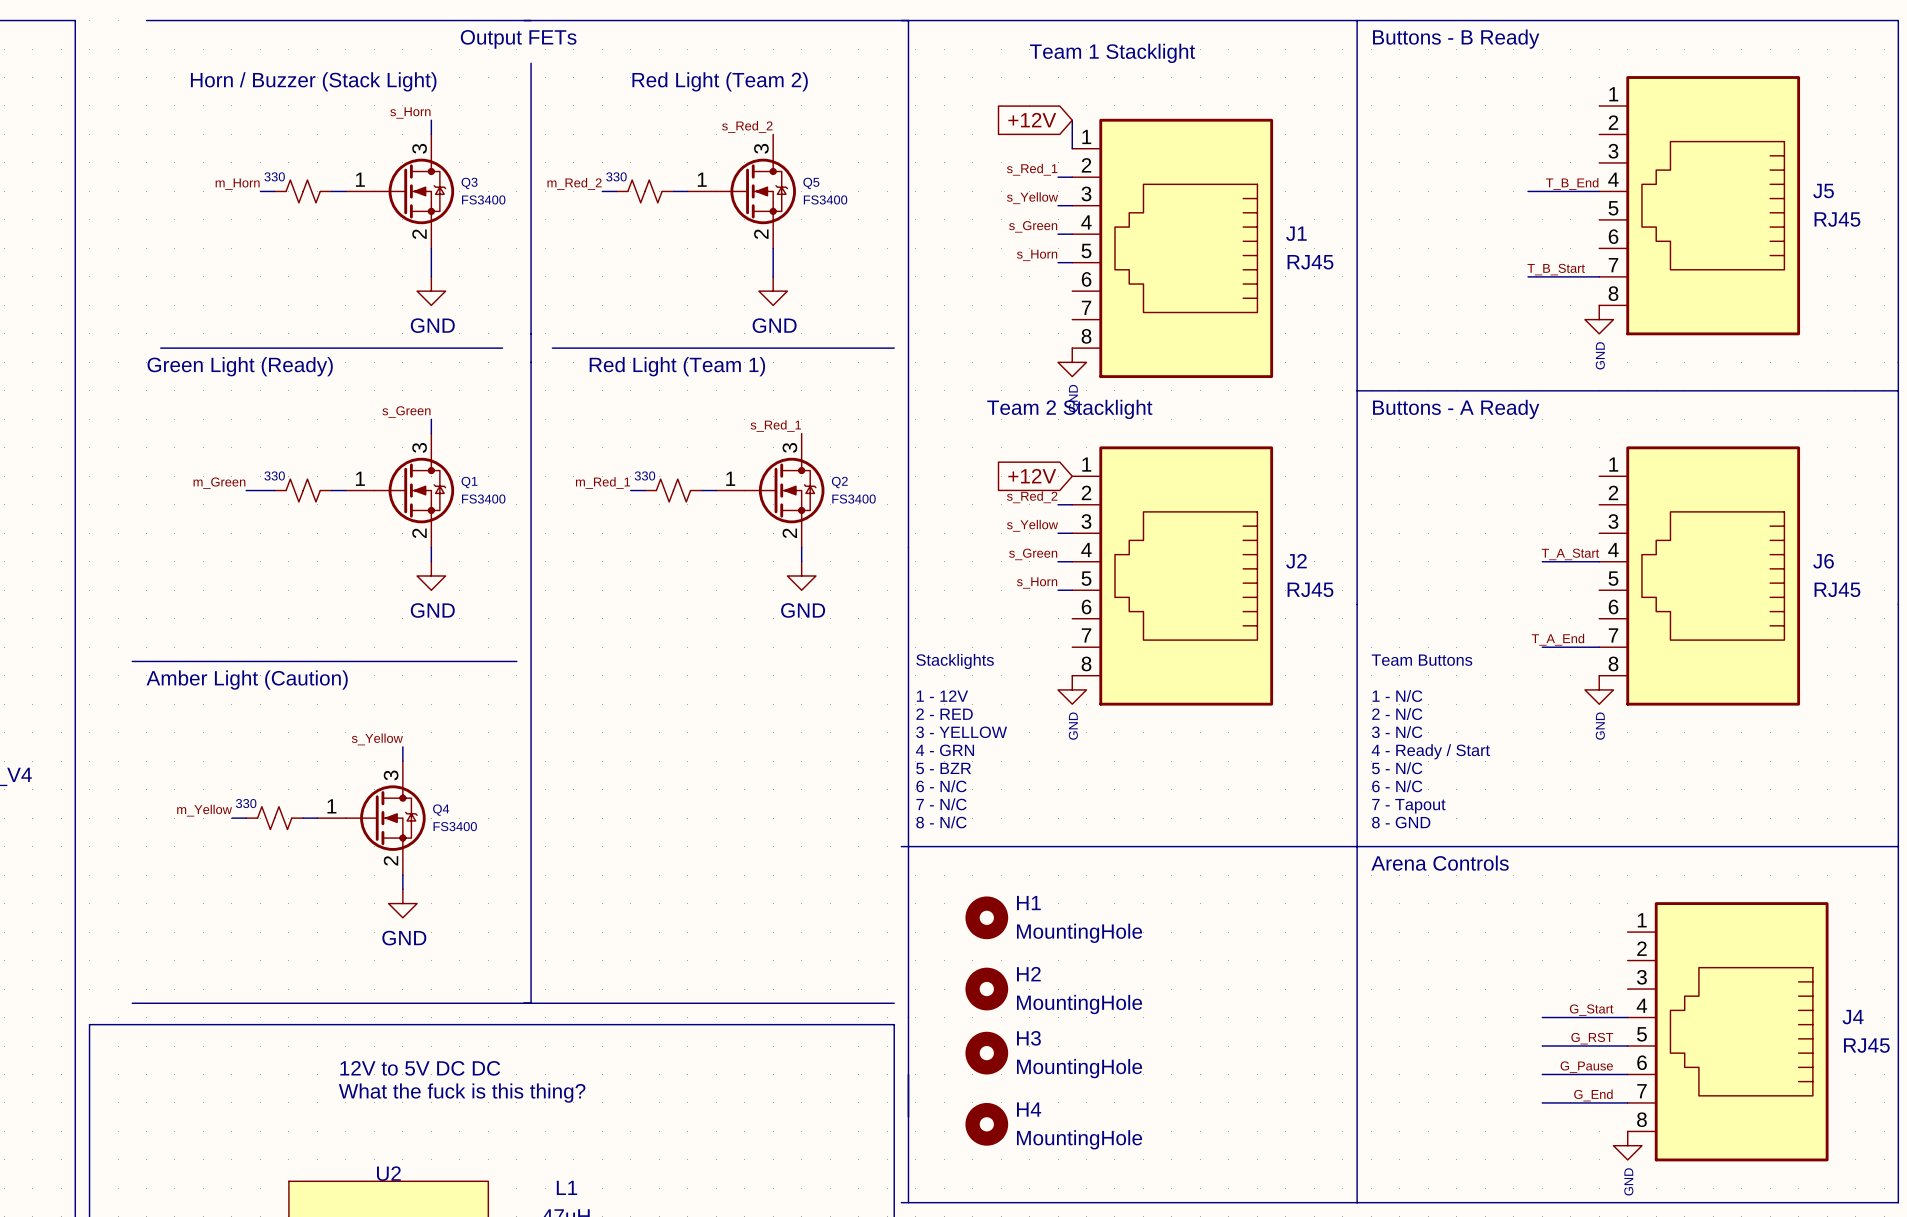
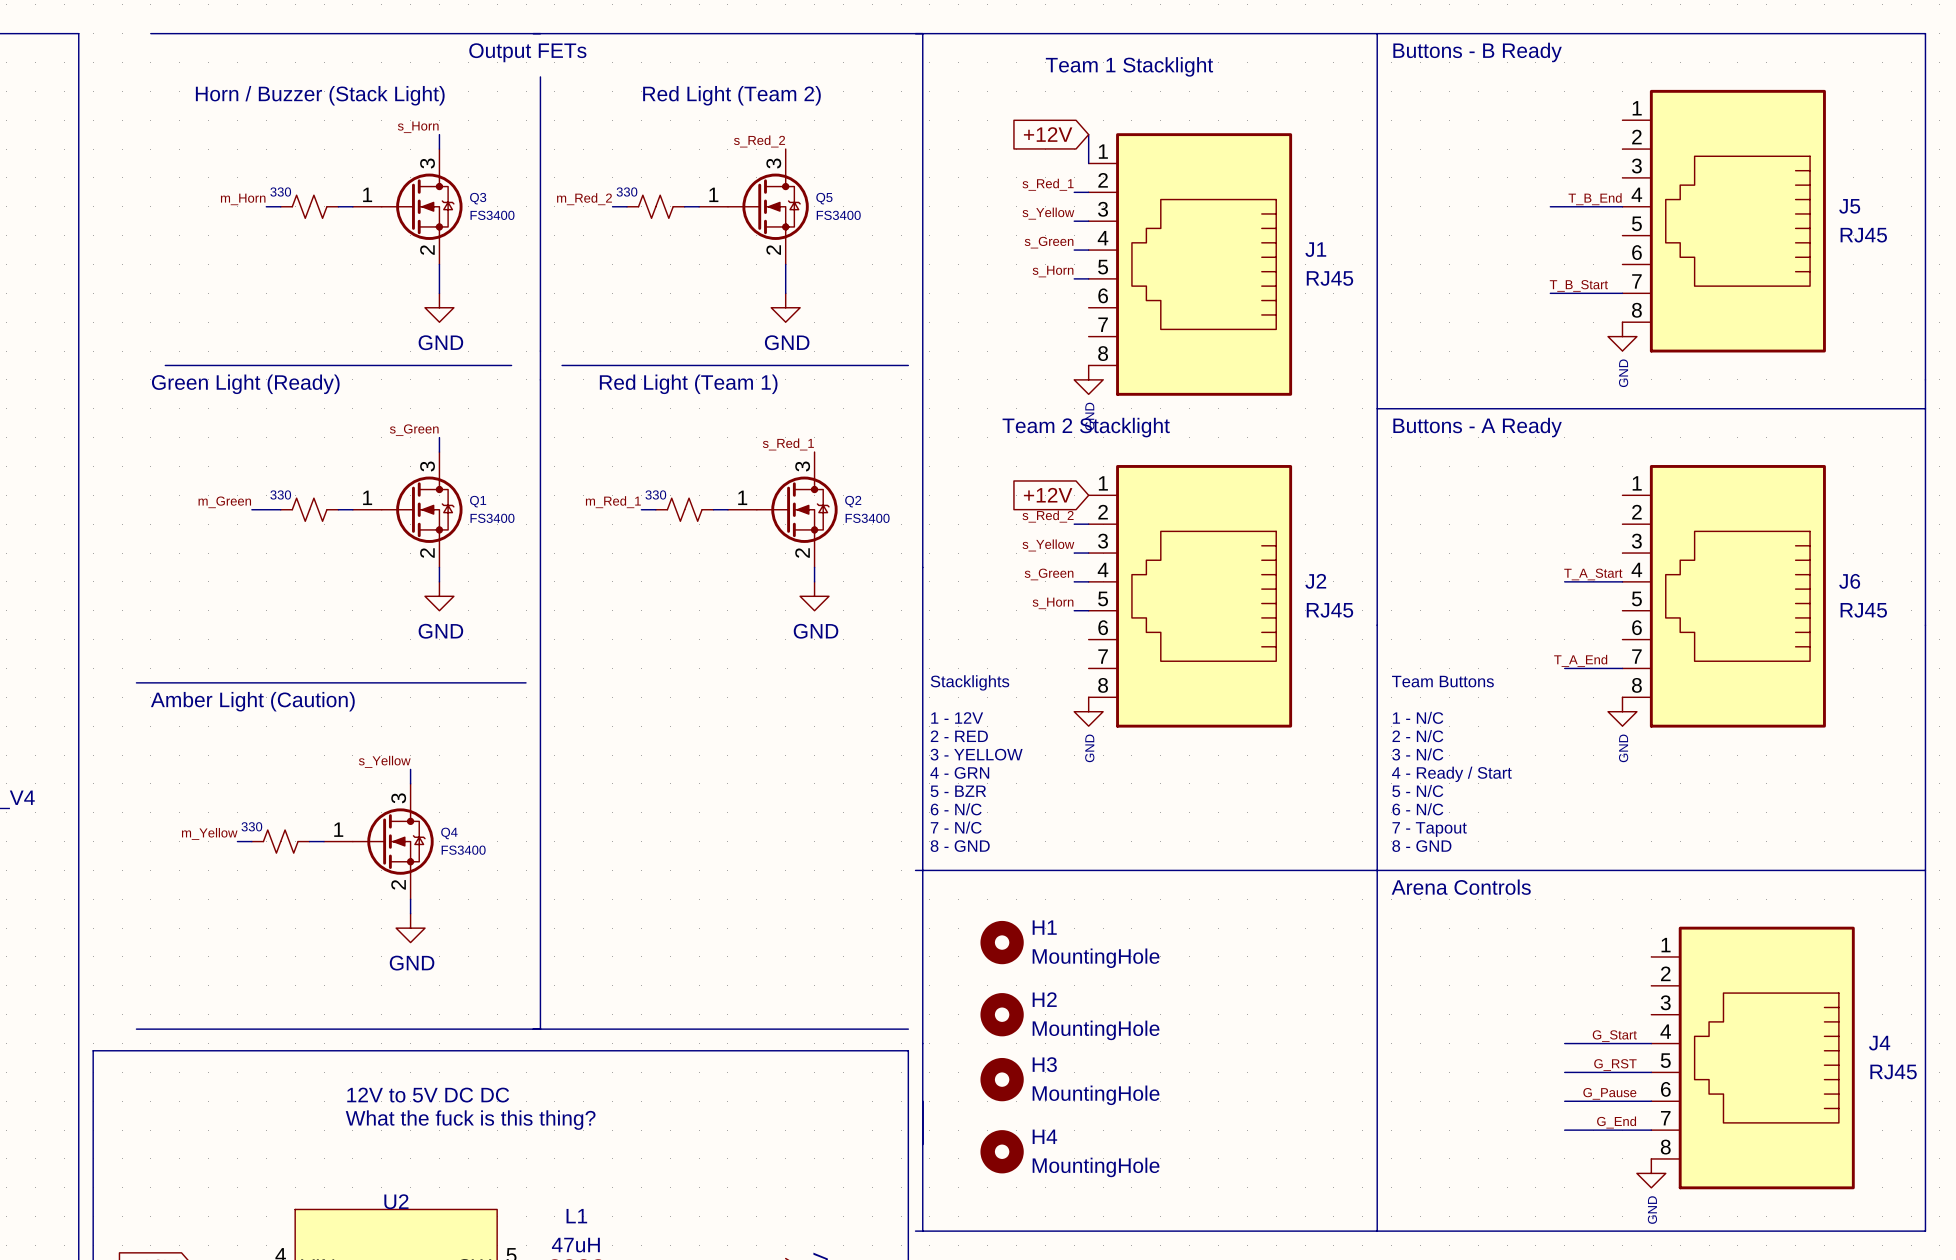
text: 8 - N/C (941, 822) -> 8 - GND (960, 846)

